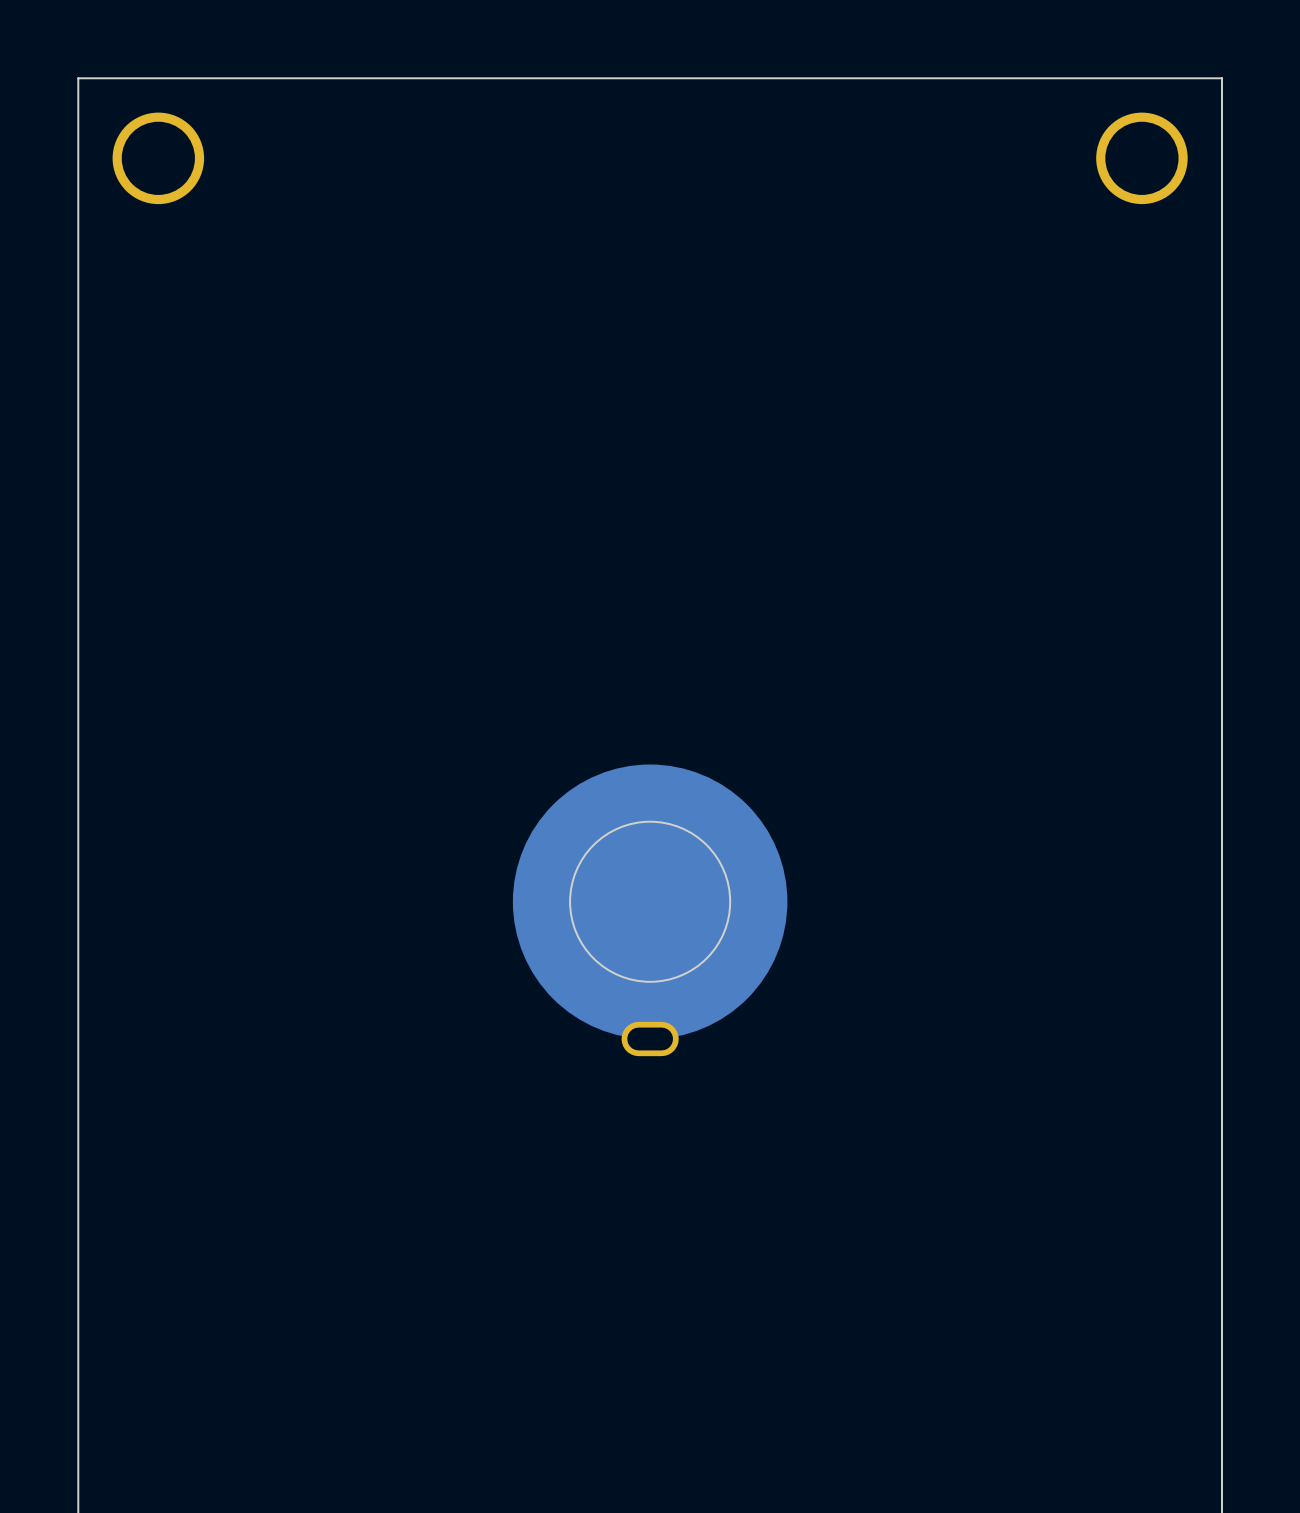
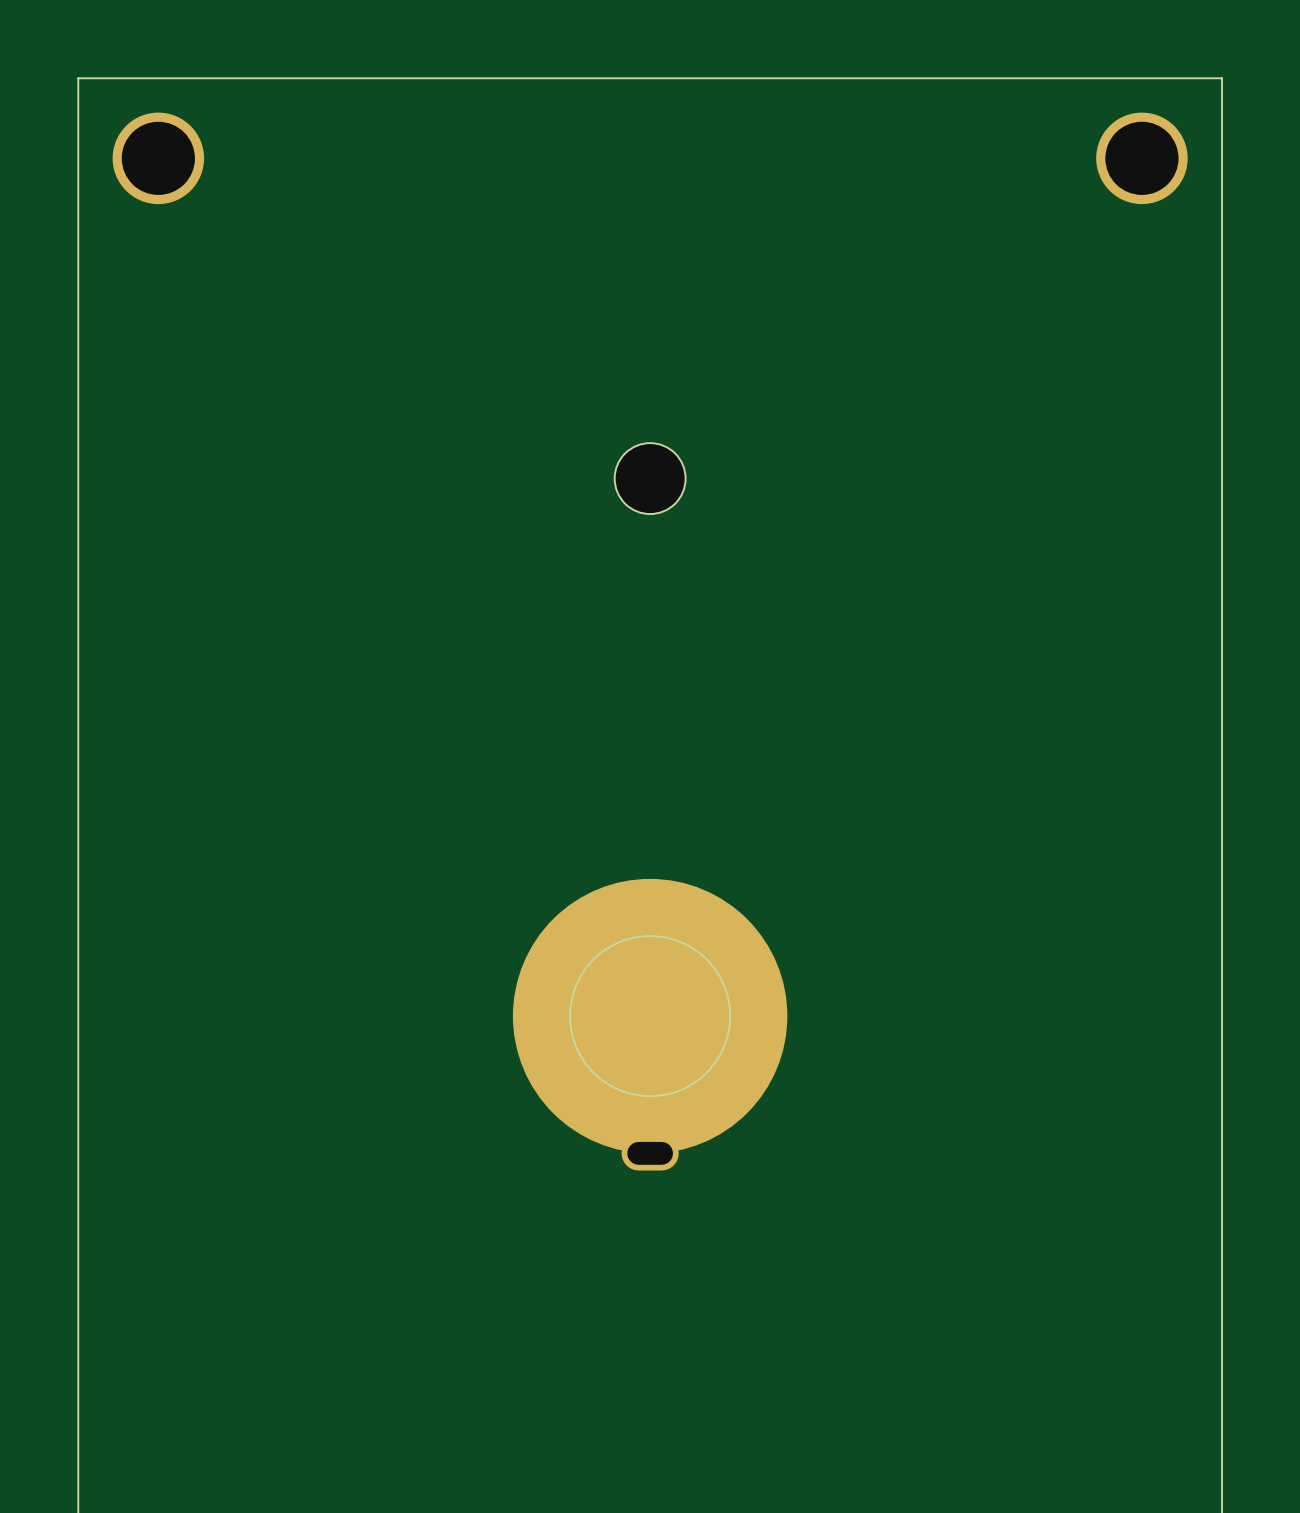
part: none -> (650, 478)
part position: (650, 910) -> (650, 1024)

